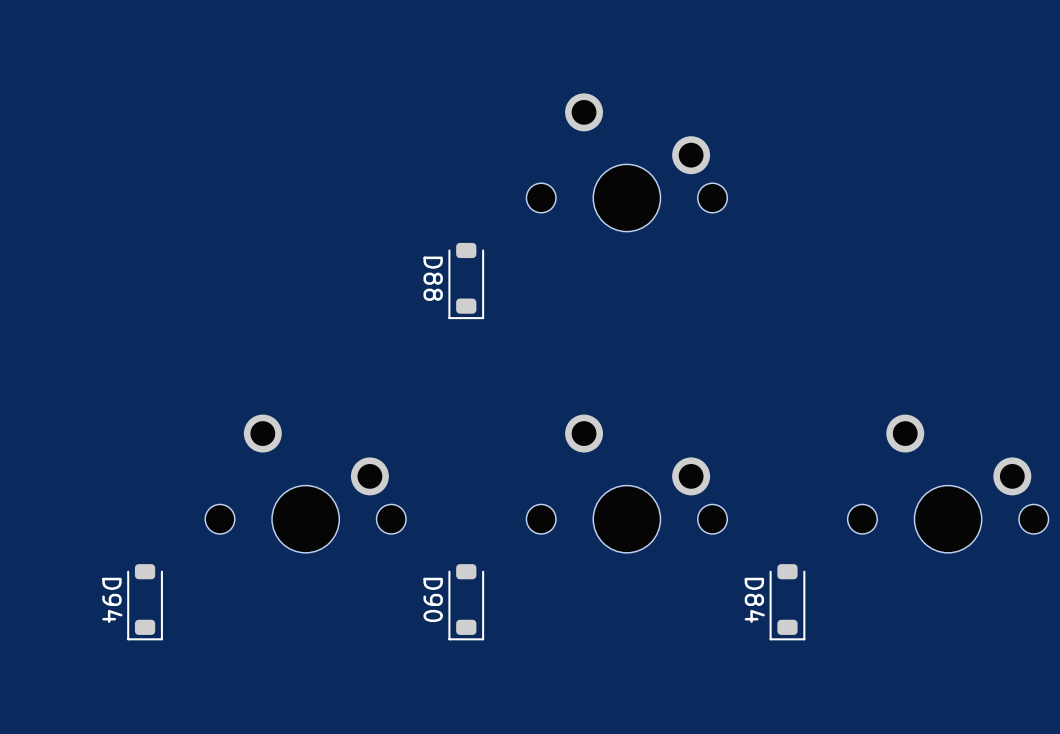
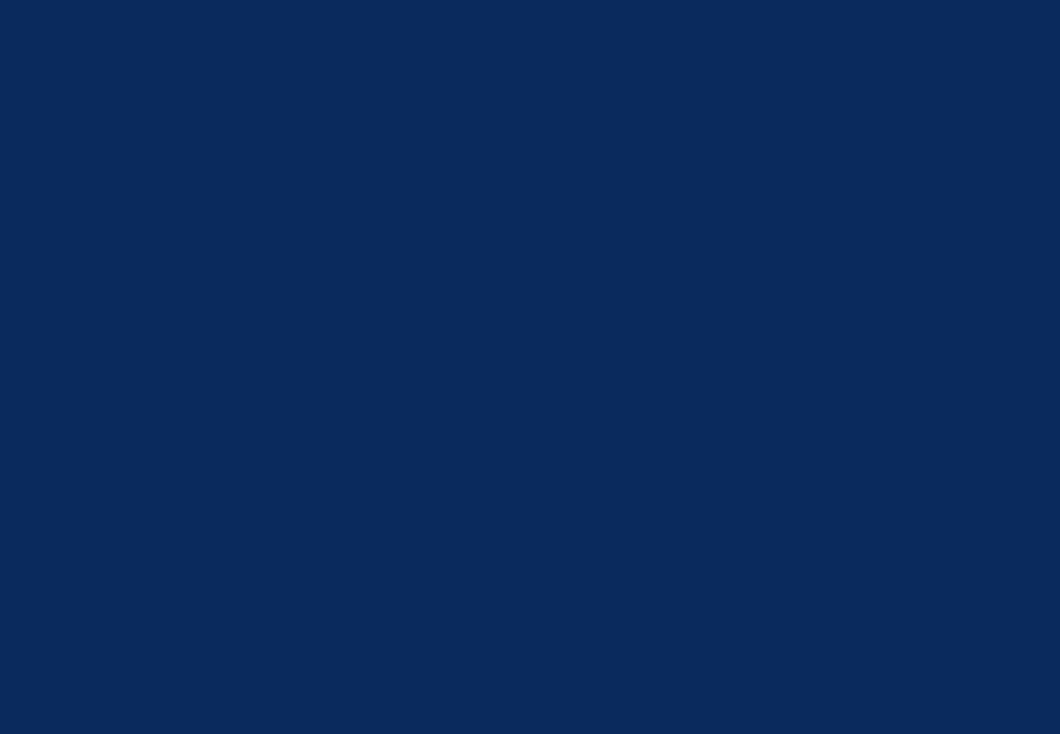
part: (626, 162) -> none
D88: (466, 281) -> none
part: (305, 483) -> none
part: (626, 483) -> none
part: (948, 483) -> none
D94: (145, 602) -> none
D90: (466, 602) -> none
D84: (787, 602) -> none

